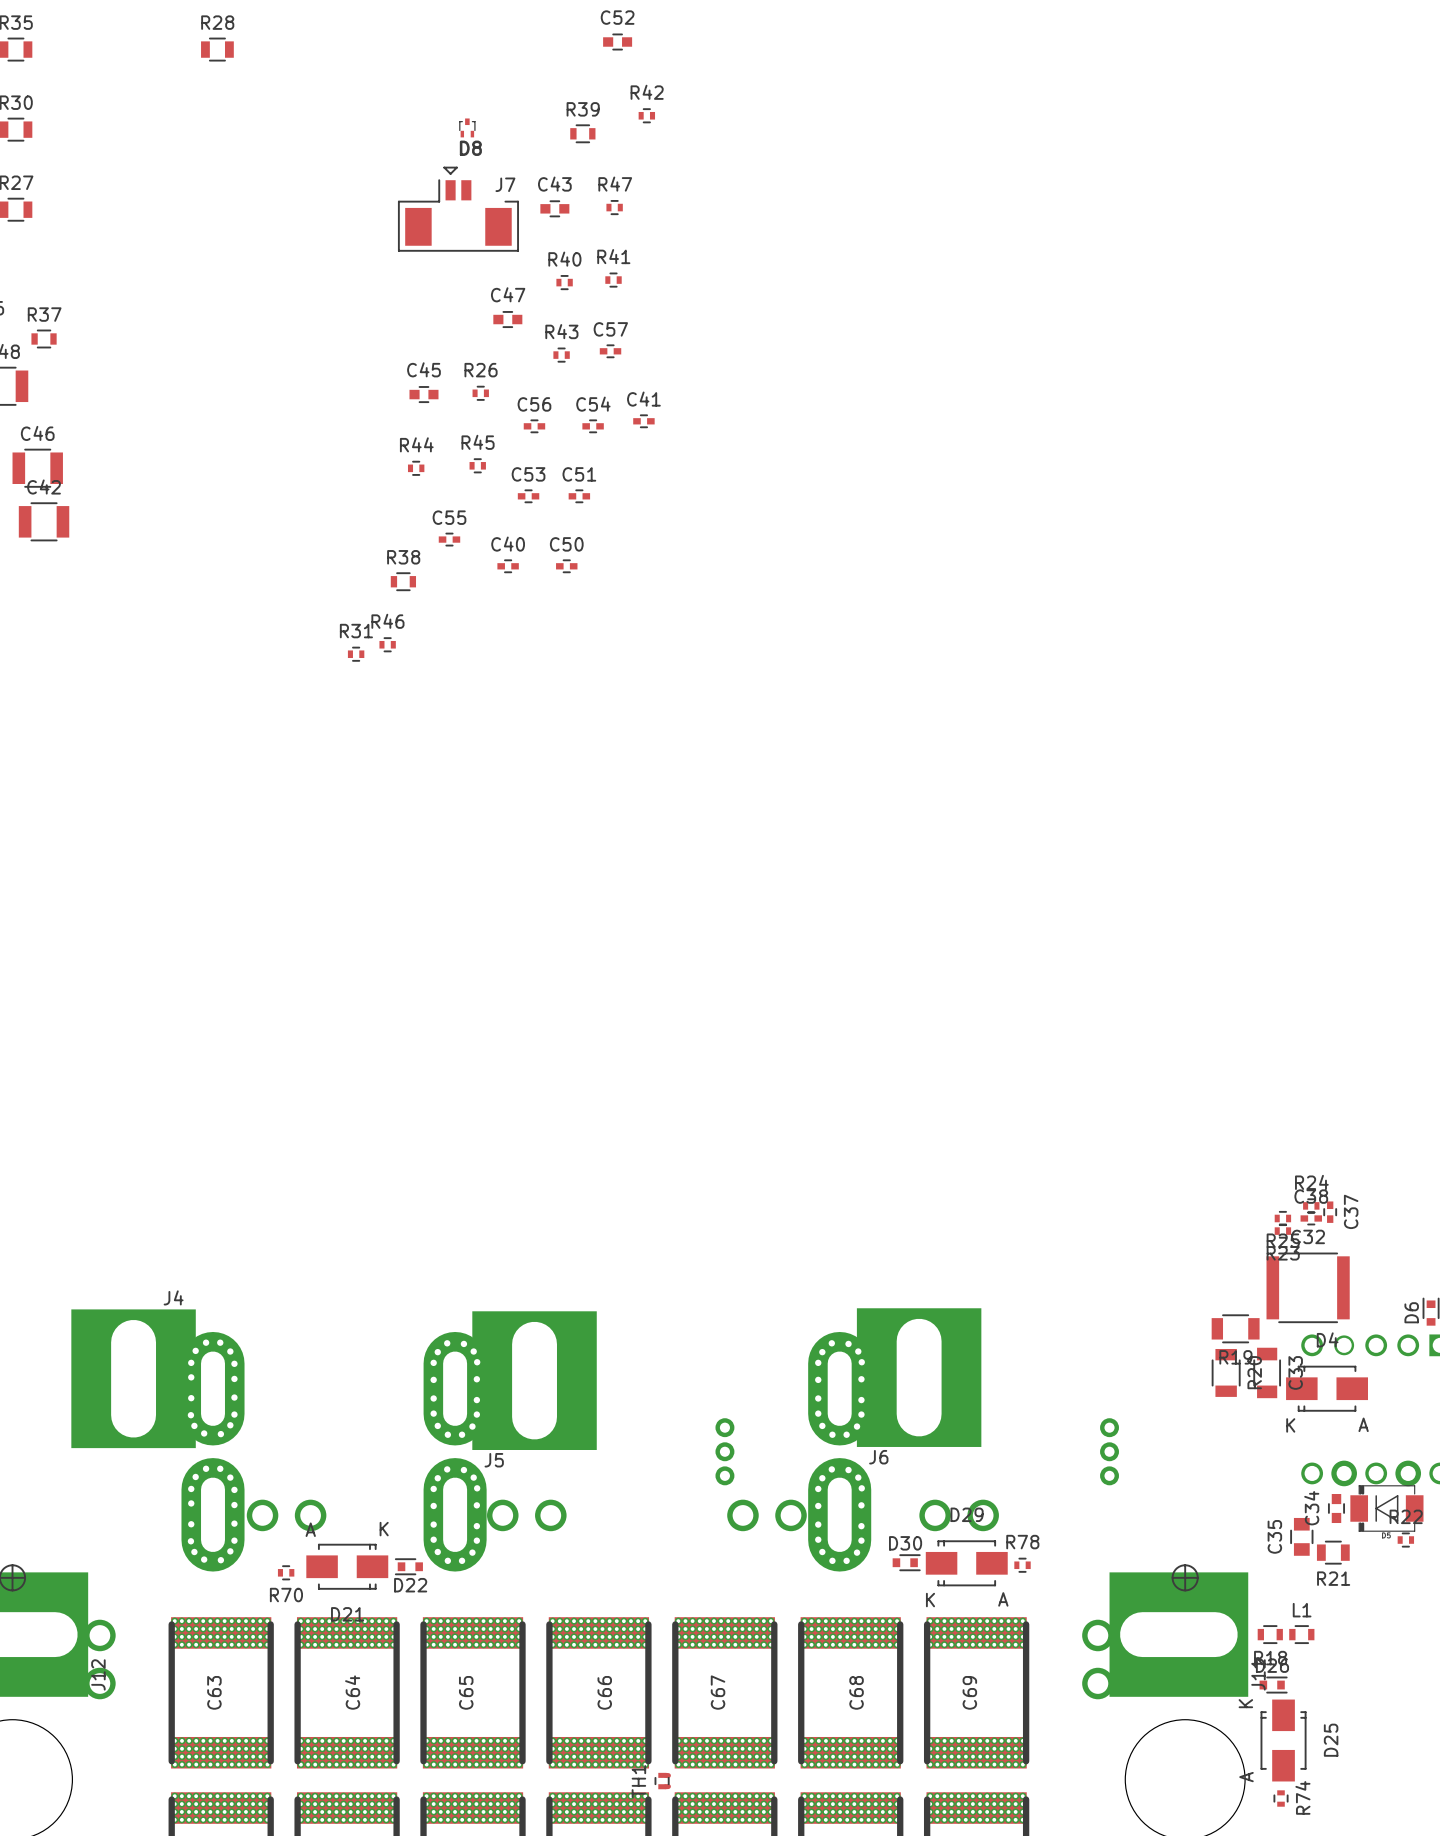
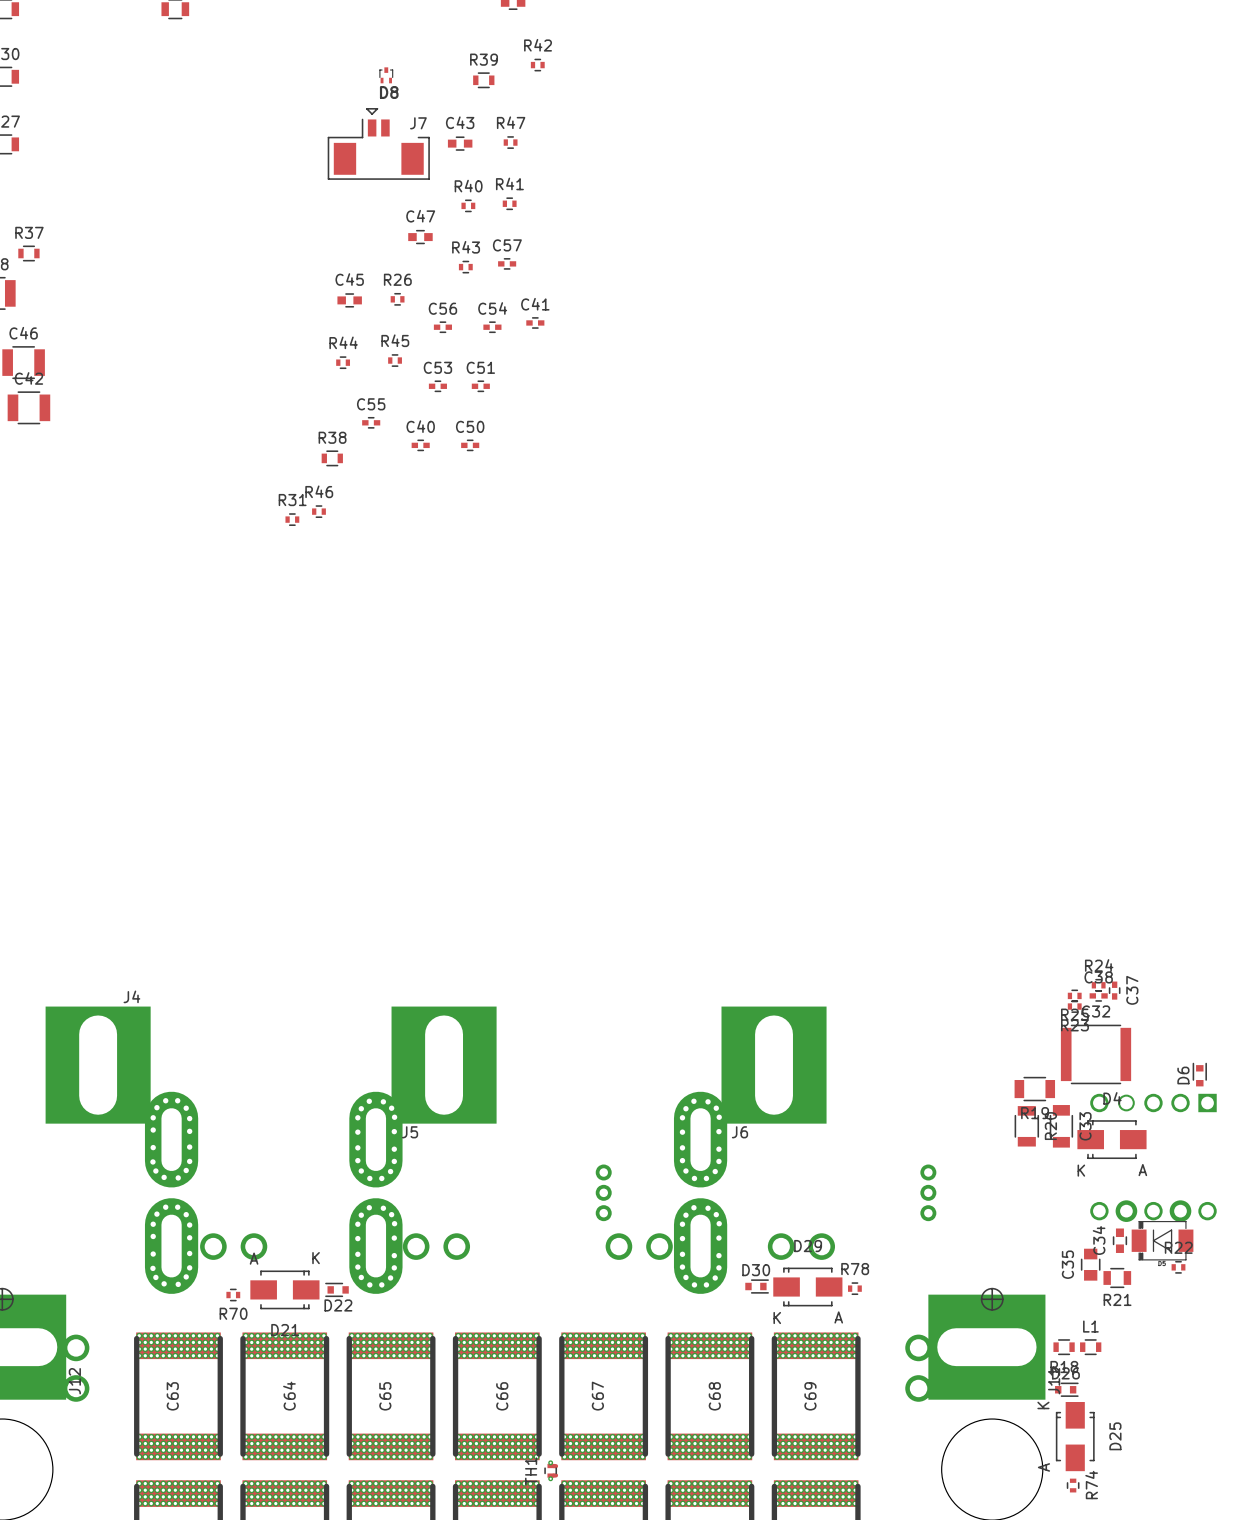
J6 position: (919, 1377) -> (774, 1065)
J4 position: (133, 1378) -> (98, 1065)
J5 position: (534, 1380) -> (444, 1065)
via: none -> (550, 1462)
via: none -> (550, 1478)

